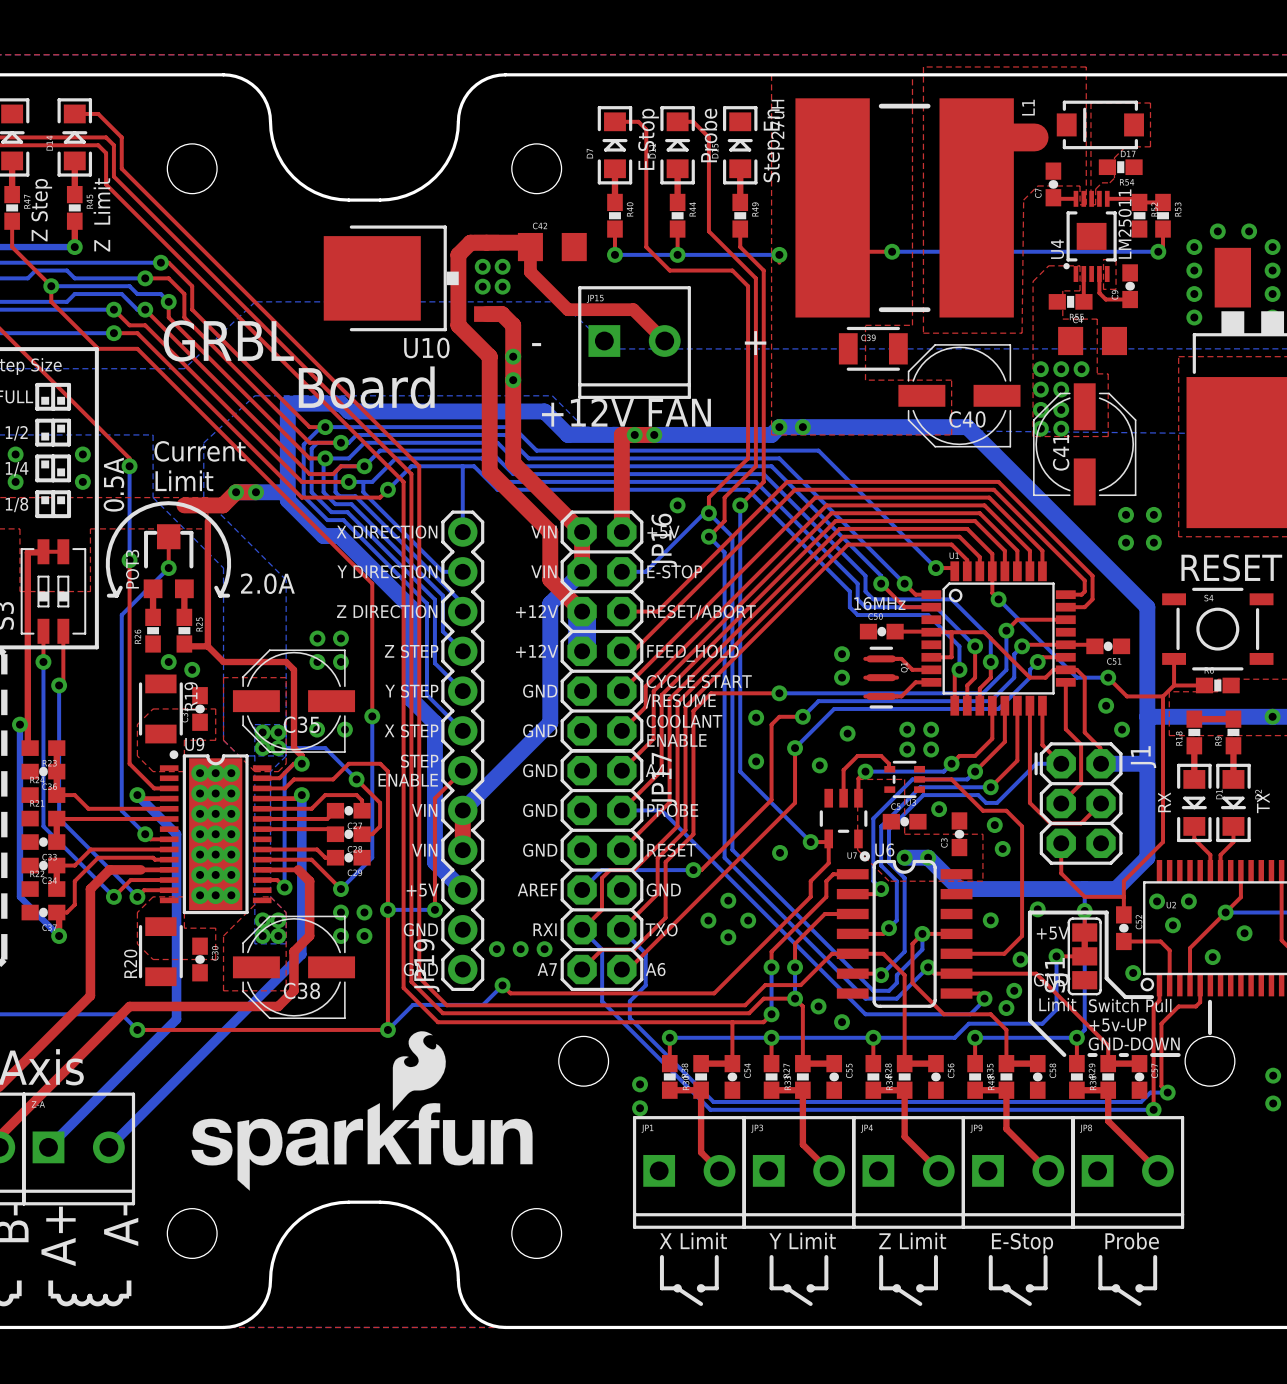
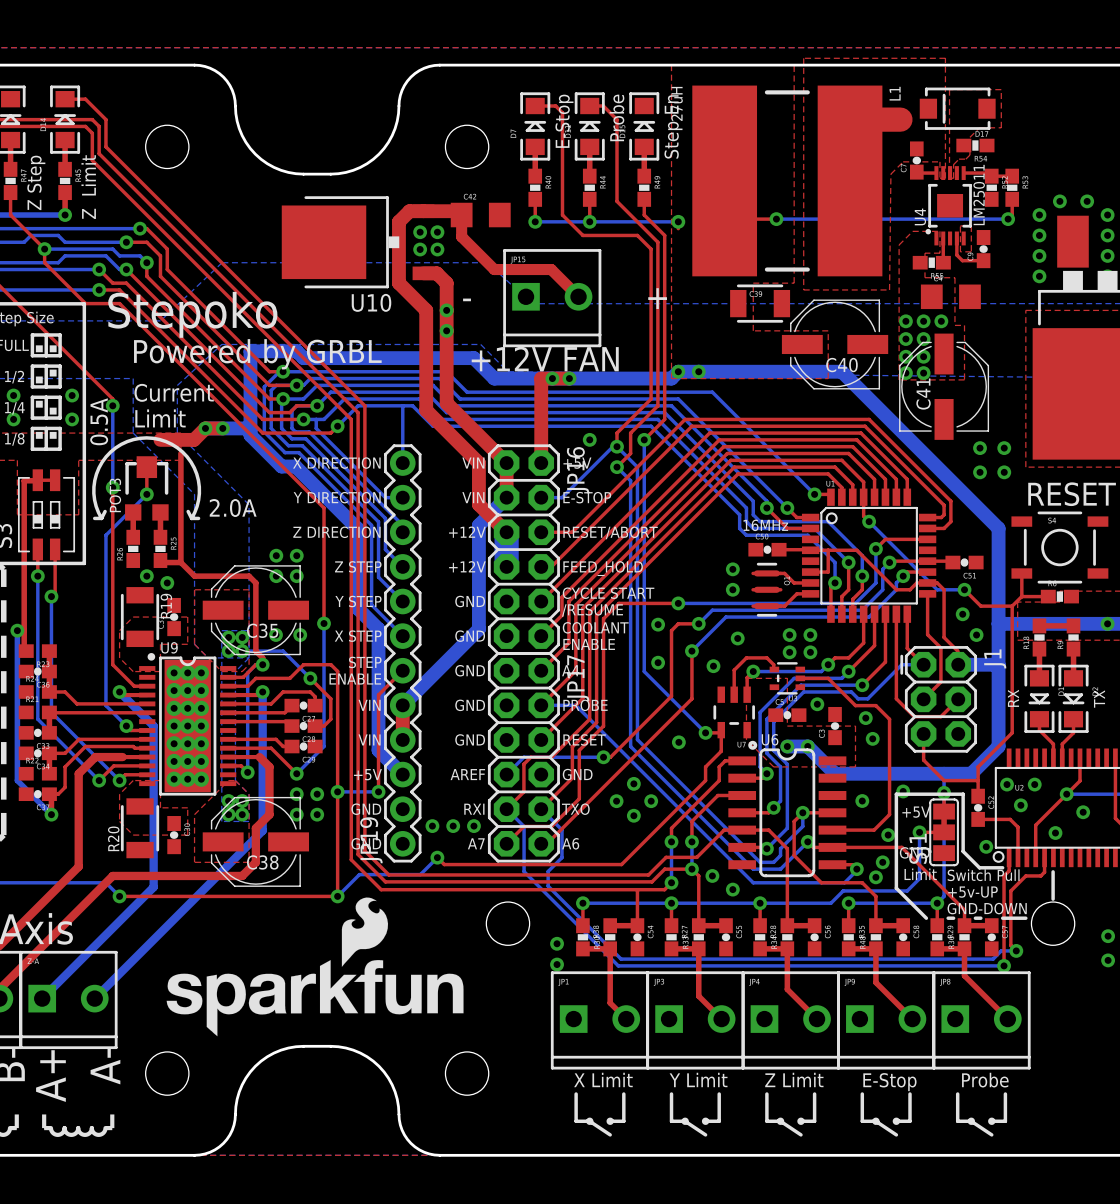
text: GRBL (228, 341) -> none
text: none -> Stepoko (192, 314)
text: Board (366, 387) -> none
text: none -> Powered by GRBL (257, 354)

